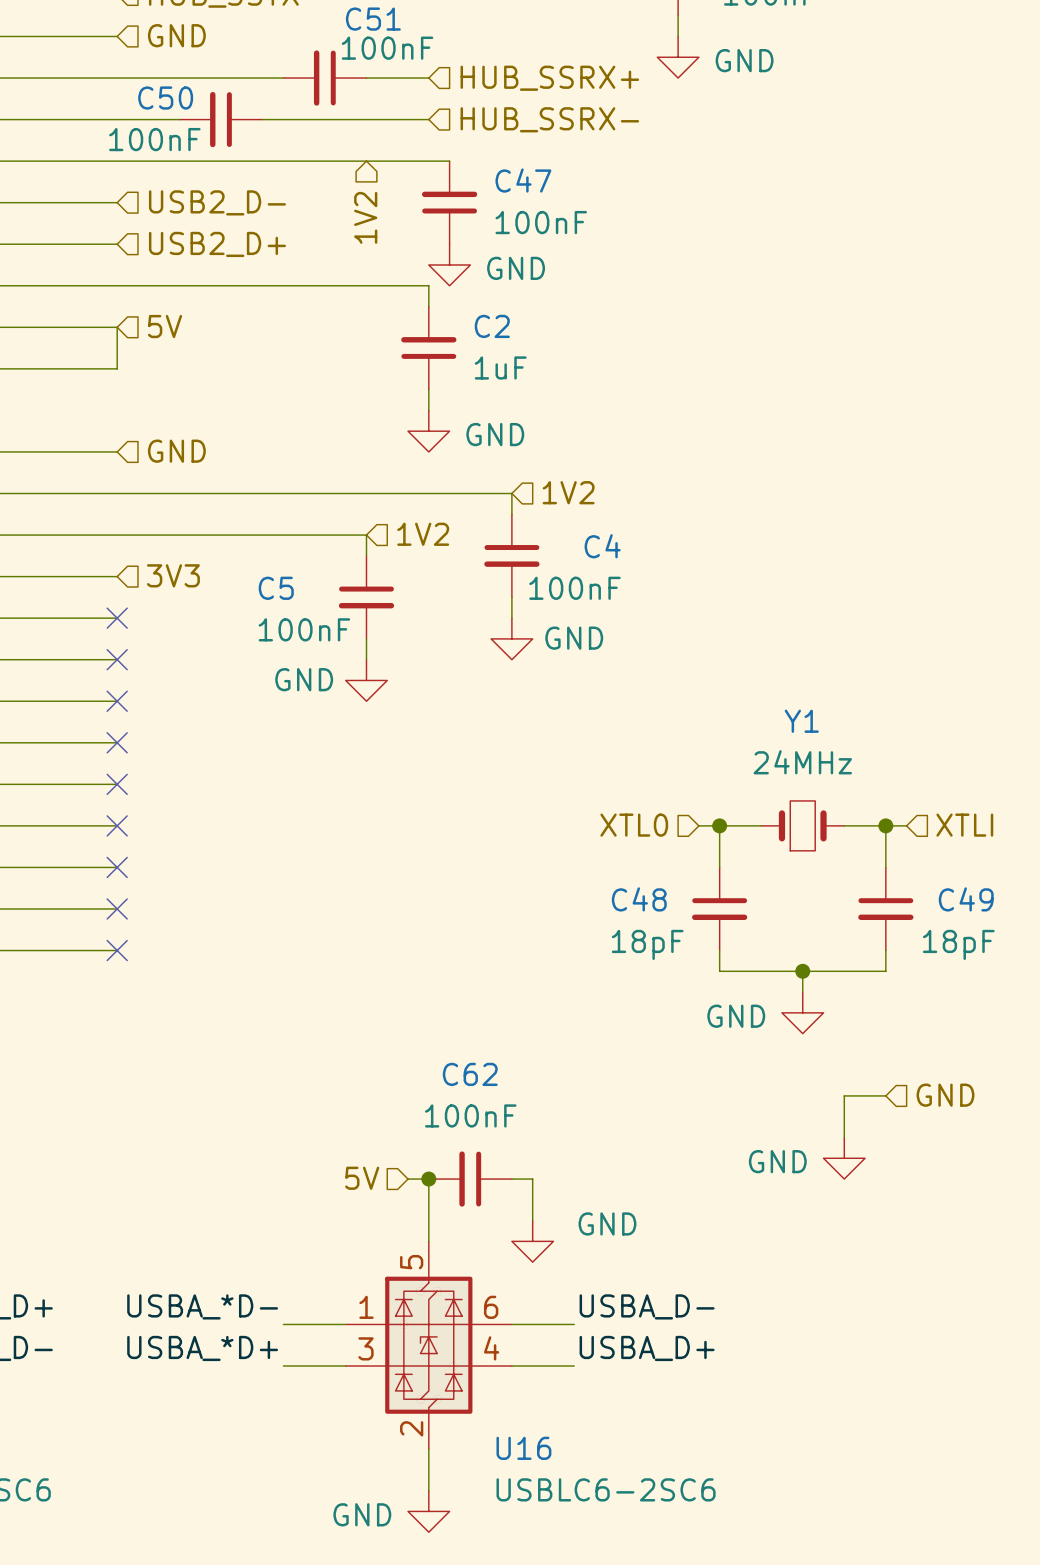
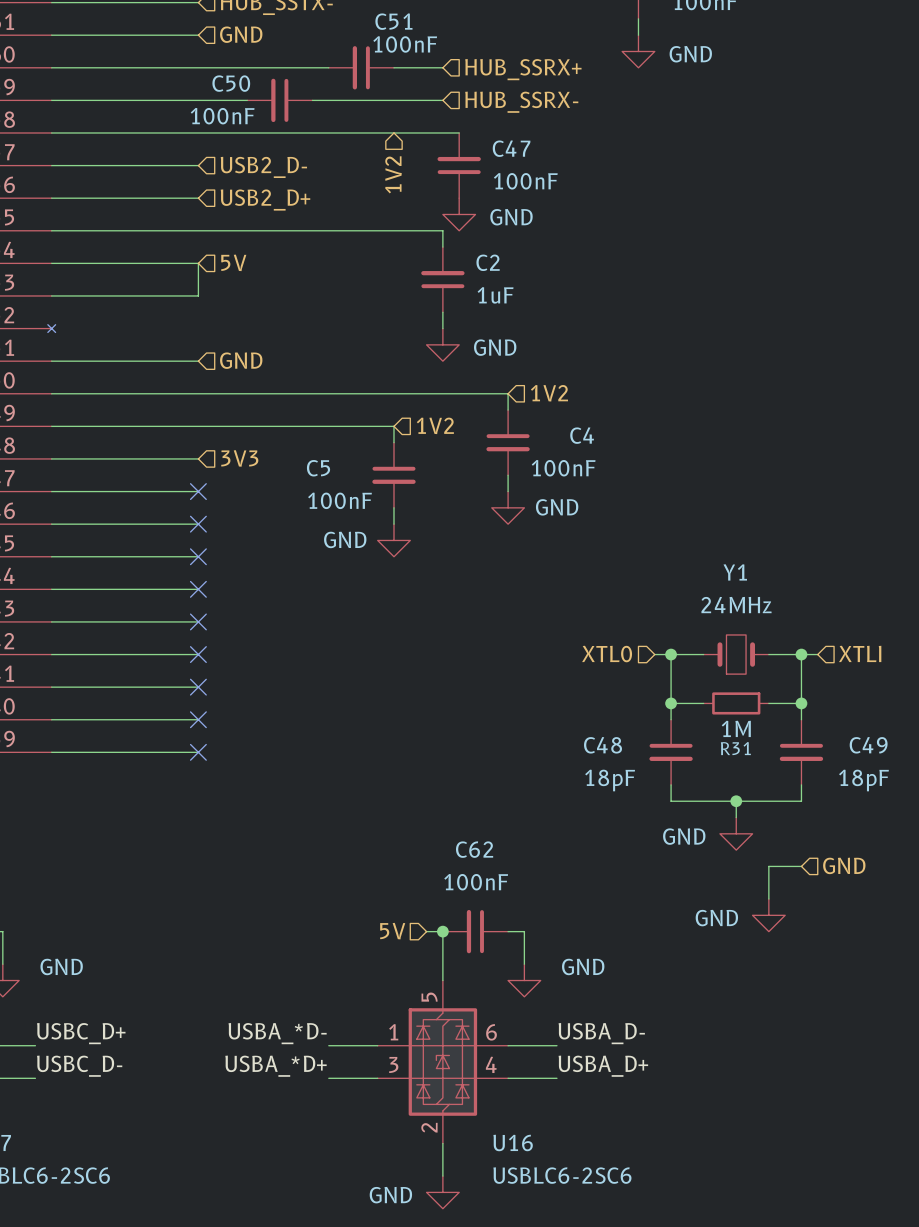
wire: none -> (671, 703) (703, 703)
junction: none -> (671, 703)
R31: none -> 1M (736, 703)
wire: none -> (768, 703) (801, 703)
junction: none -> (801, 703)
C48 position: (719, 908) -> (671, 752)
C49 position: (885, 908) -> (801, 752)
wire: (719, 950) (719, 971) (885, 971) (885, 950) -> (671, 784) (671, 801) (801, 801) (801, 784)
wire: (802, 971) (802, 992) -> (736, 801) (736, 817)
junction position: (802, 971) -> (736, 801)
power symbol position: GND (802, 1012) -> GND (736, 833)

